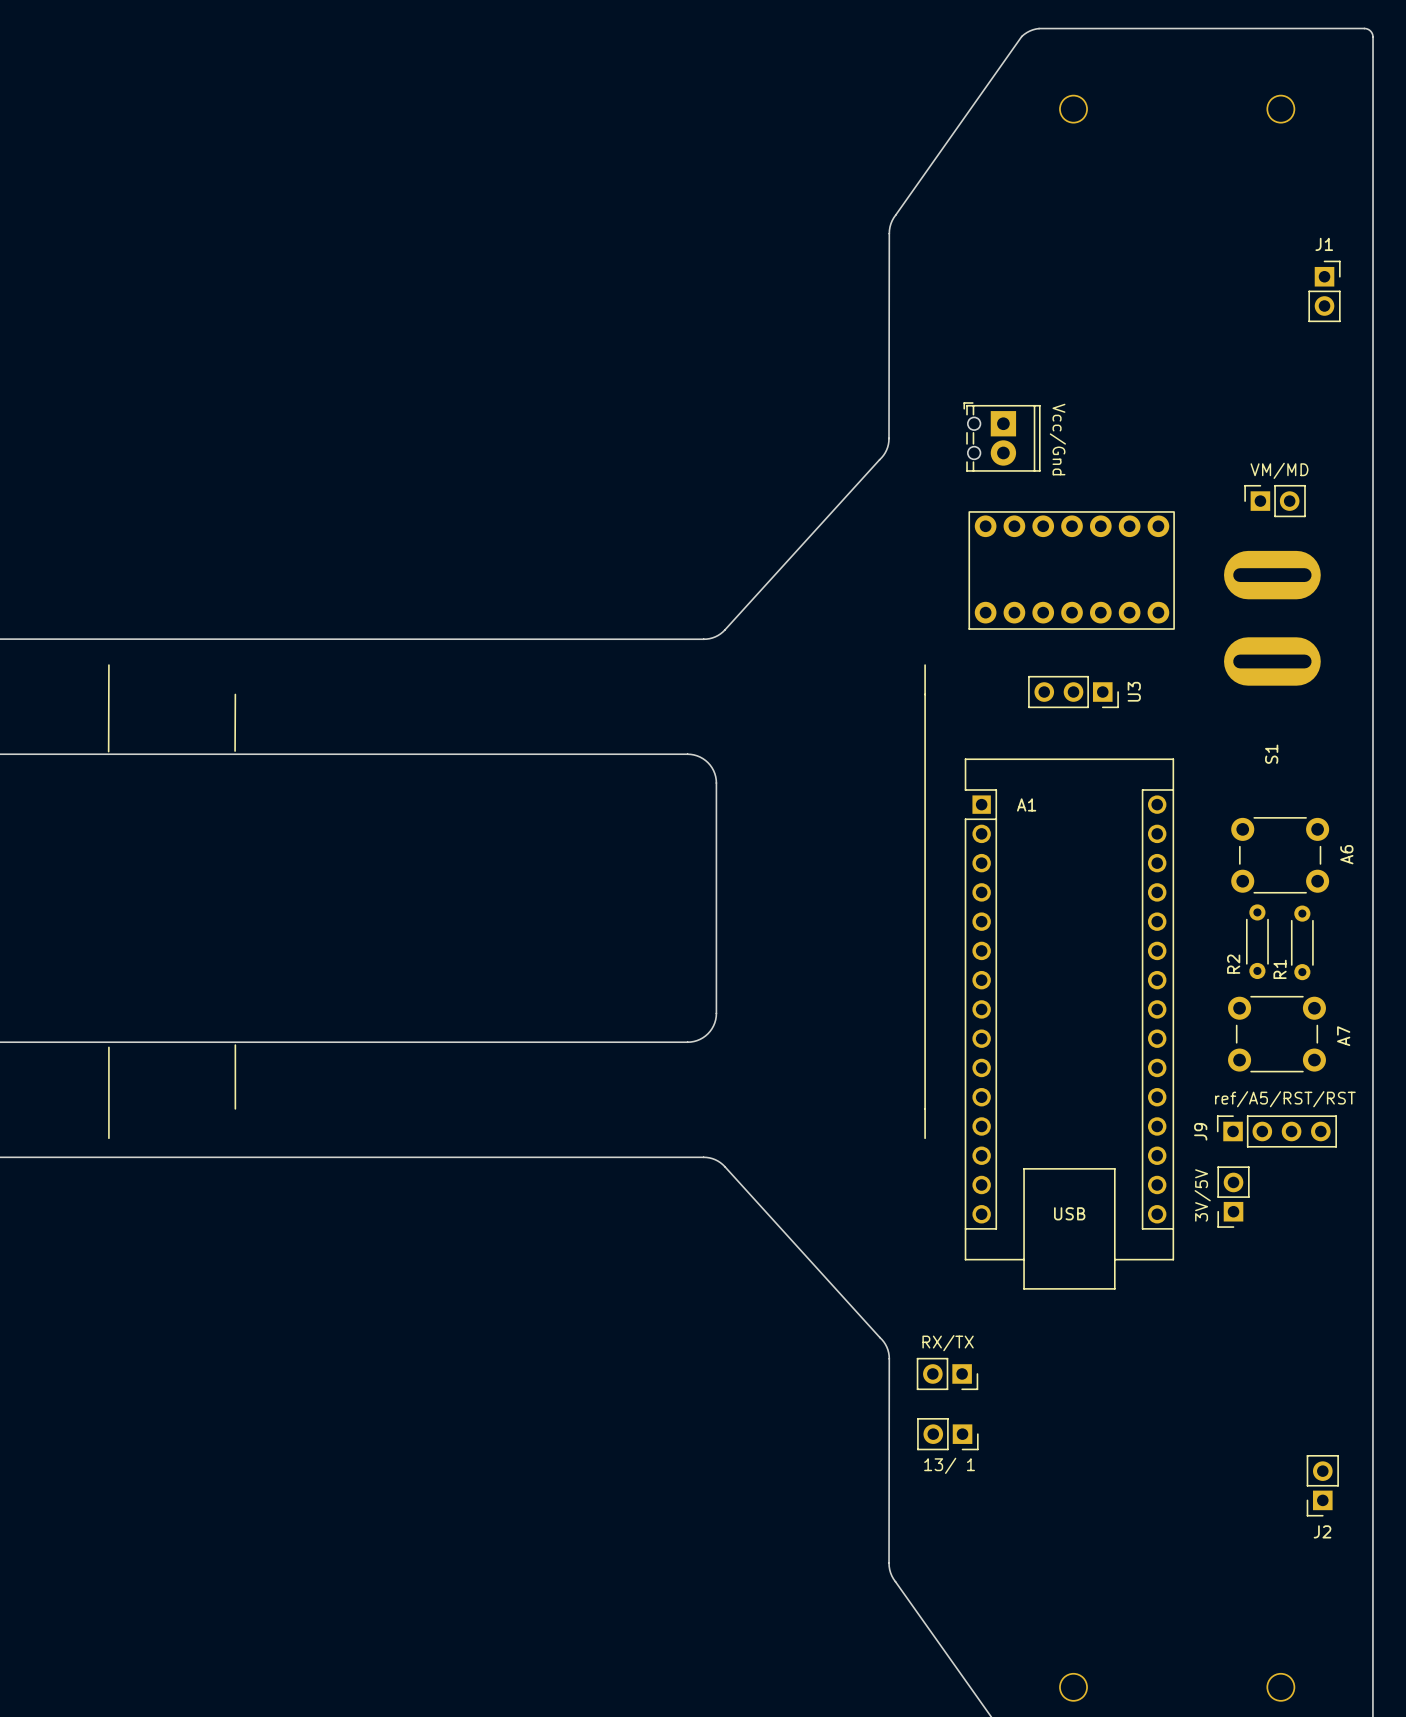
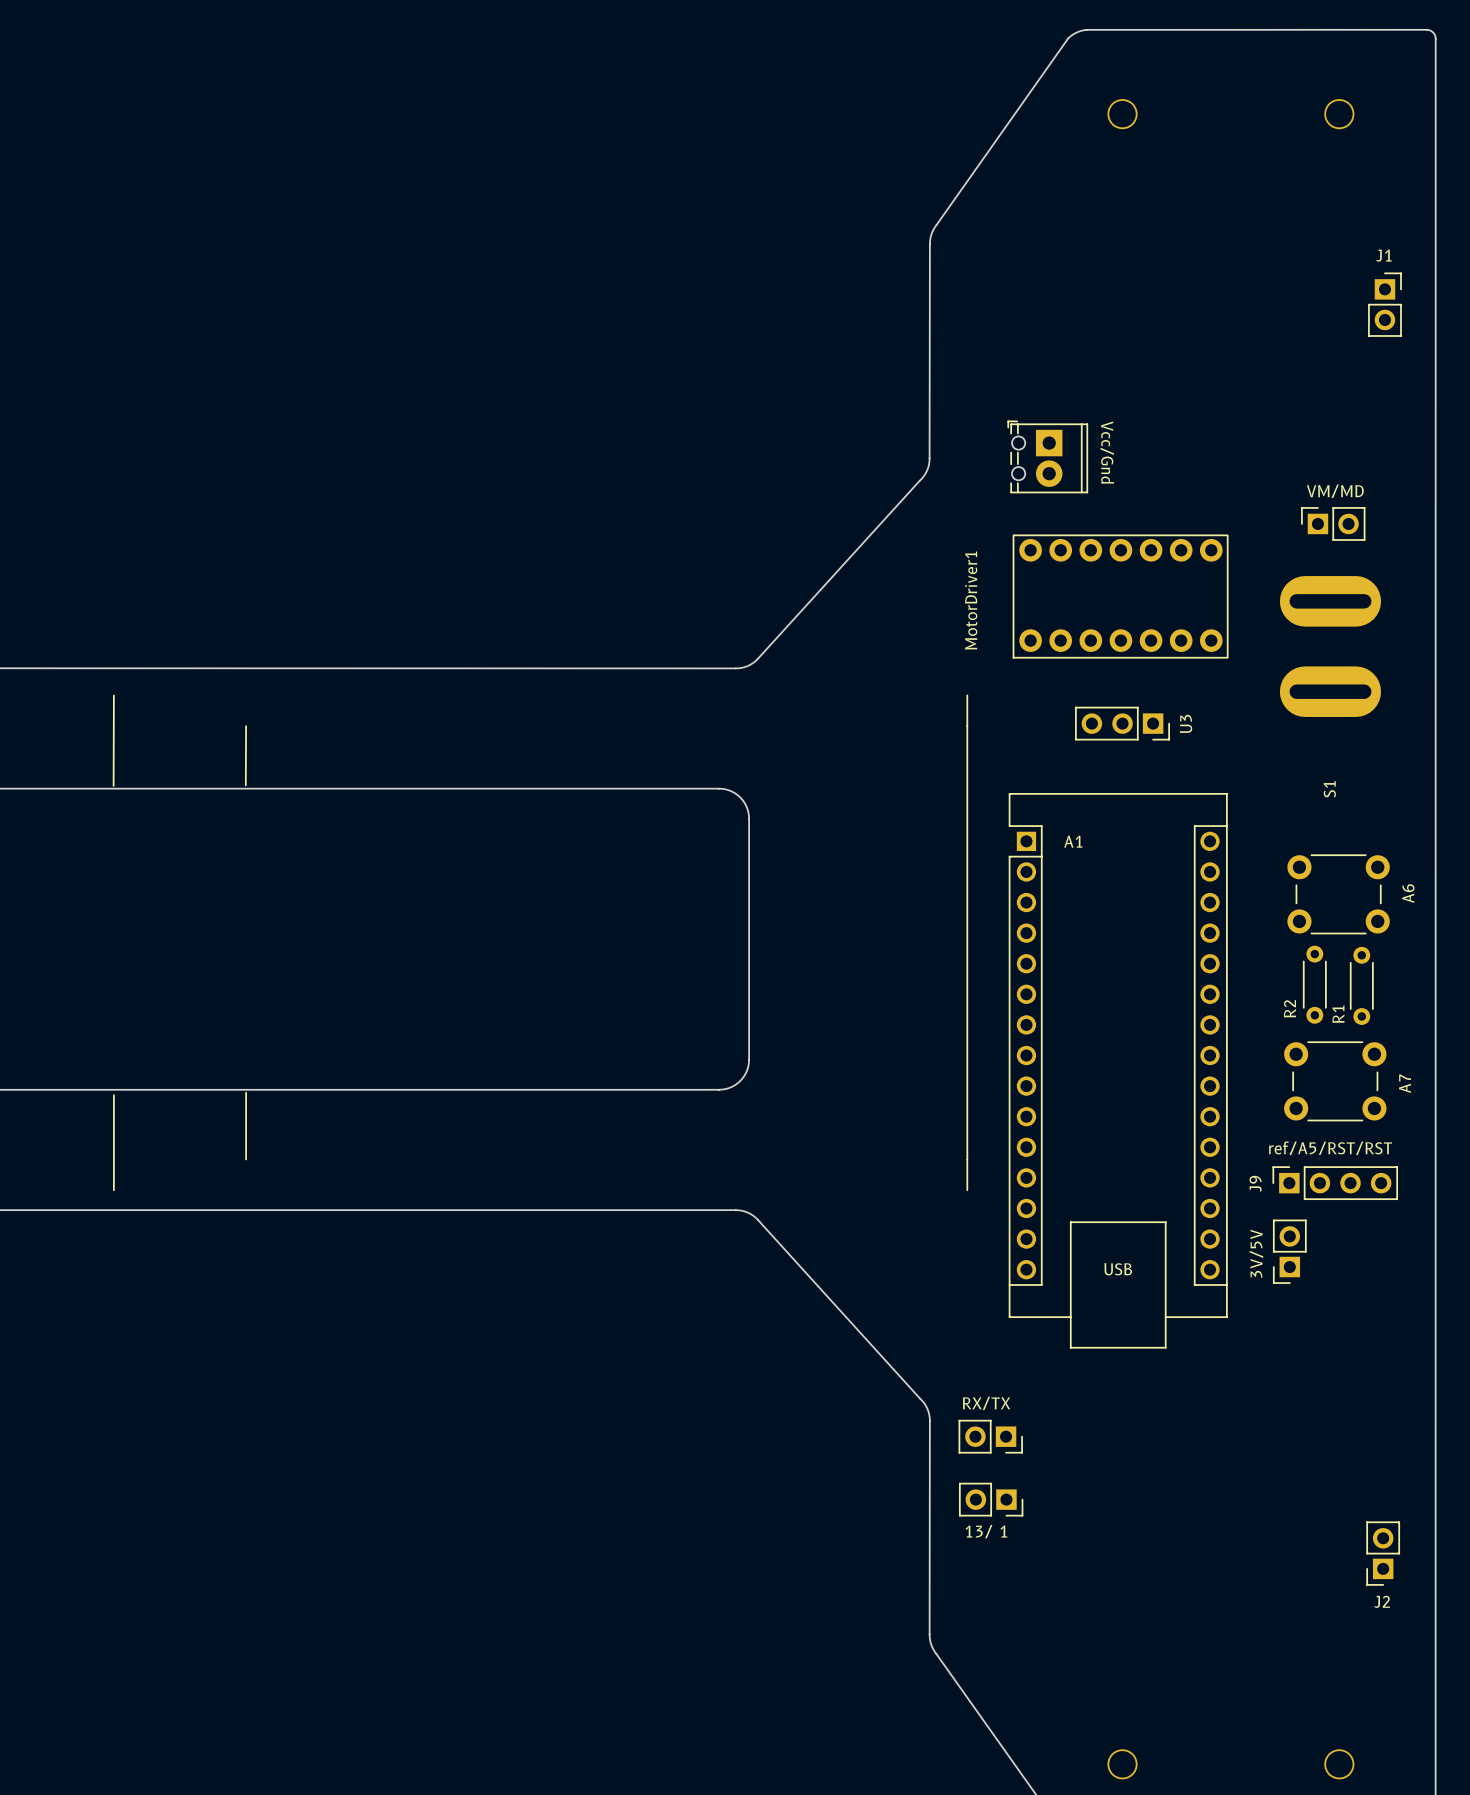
MotorDriver1 name: none -> MotorDriver1 (971, 600)

